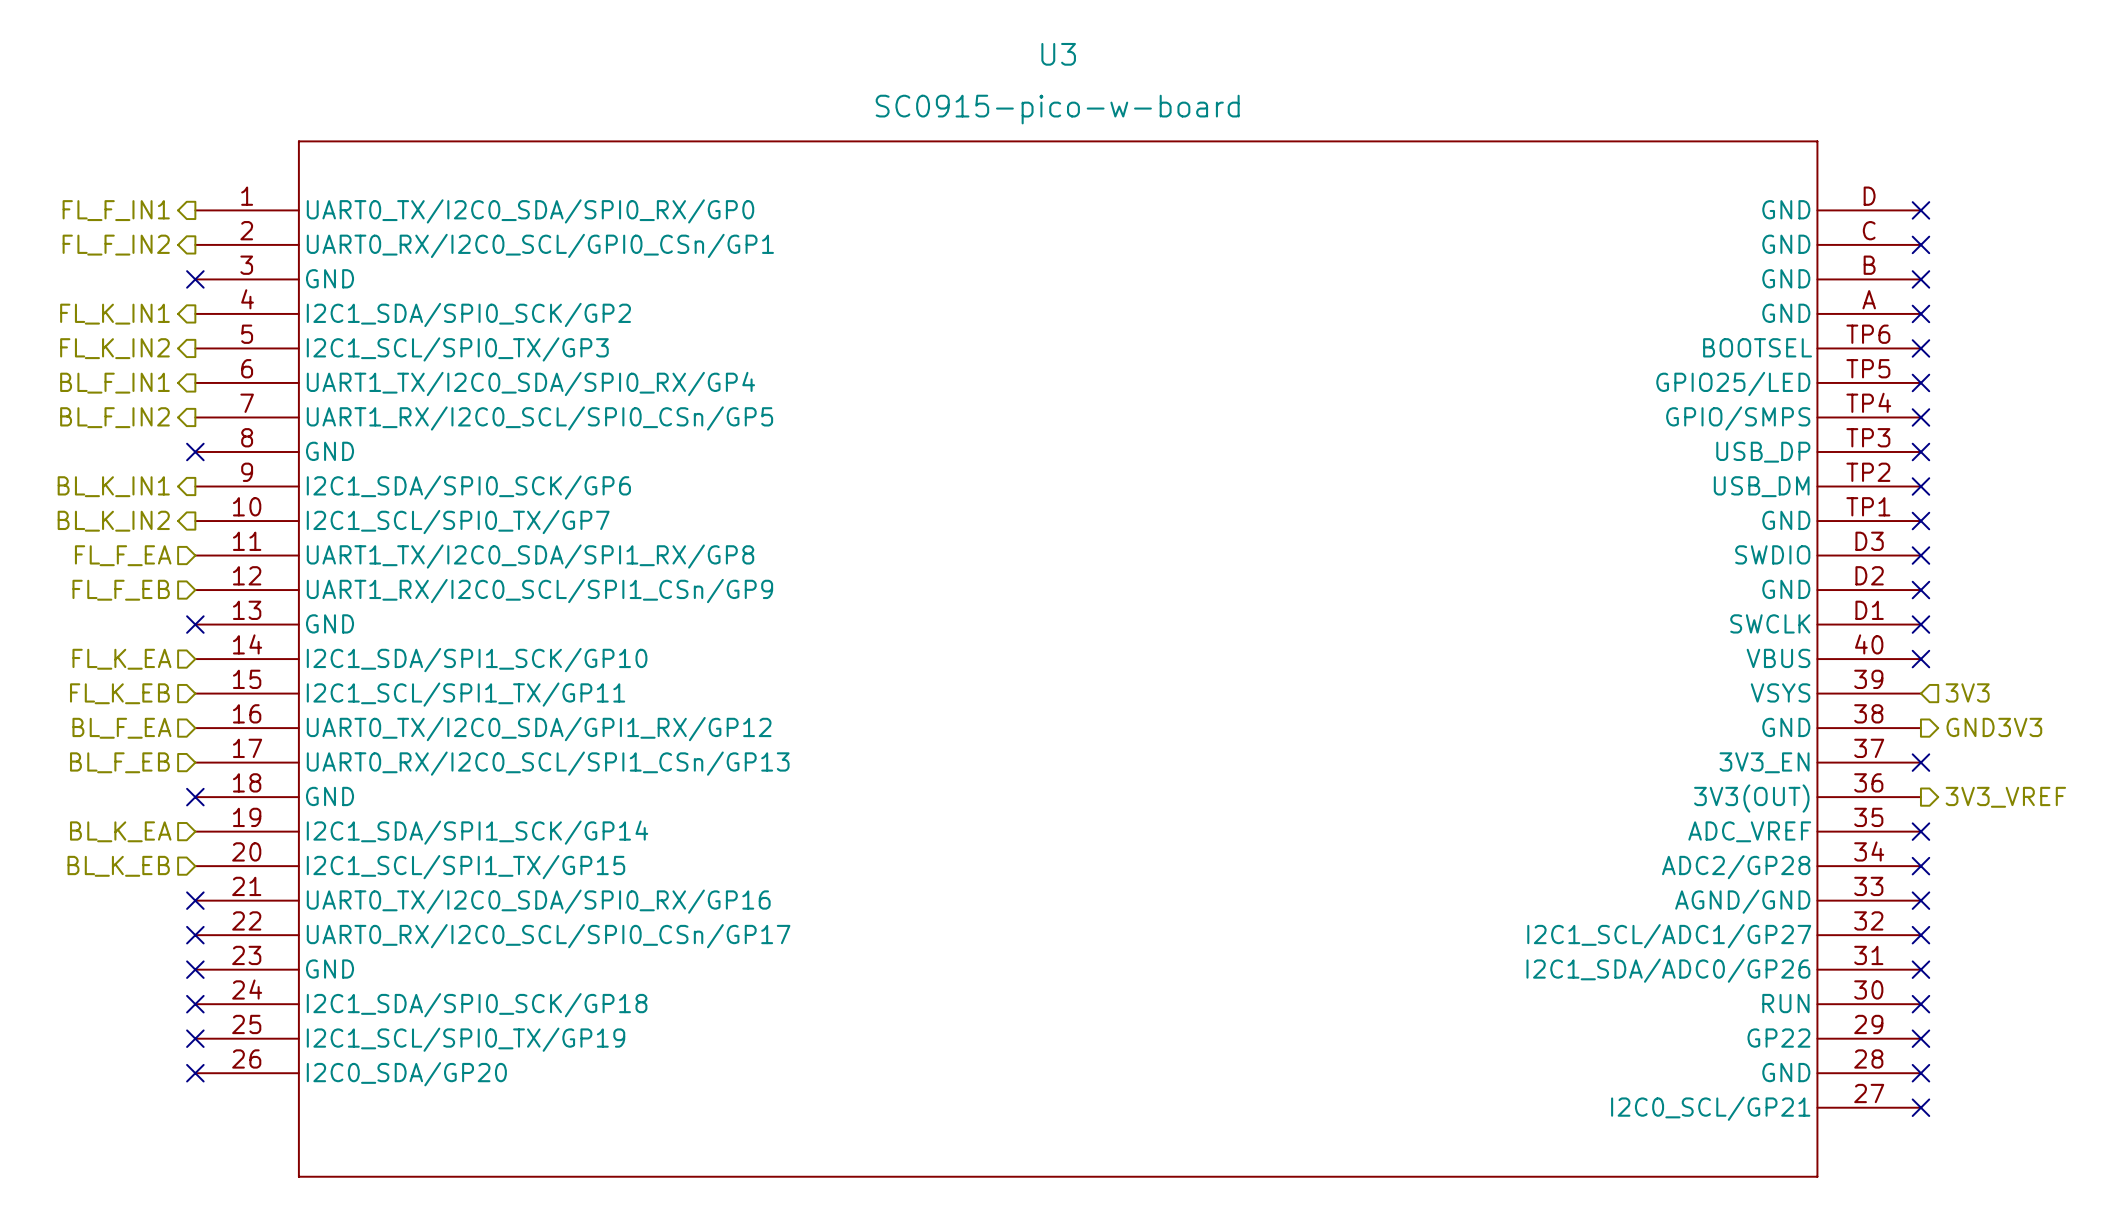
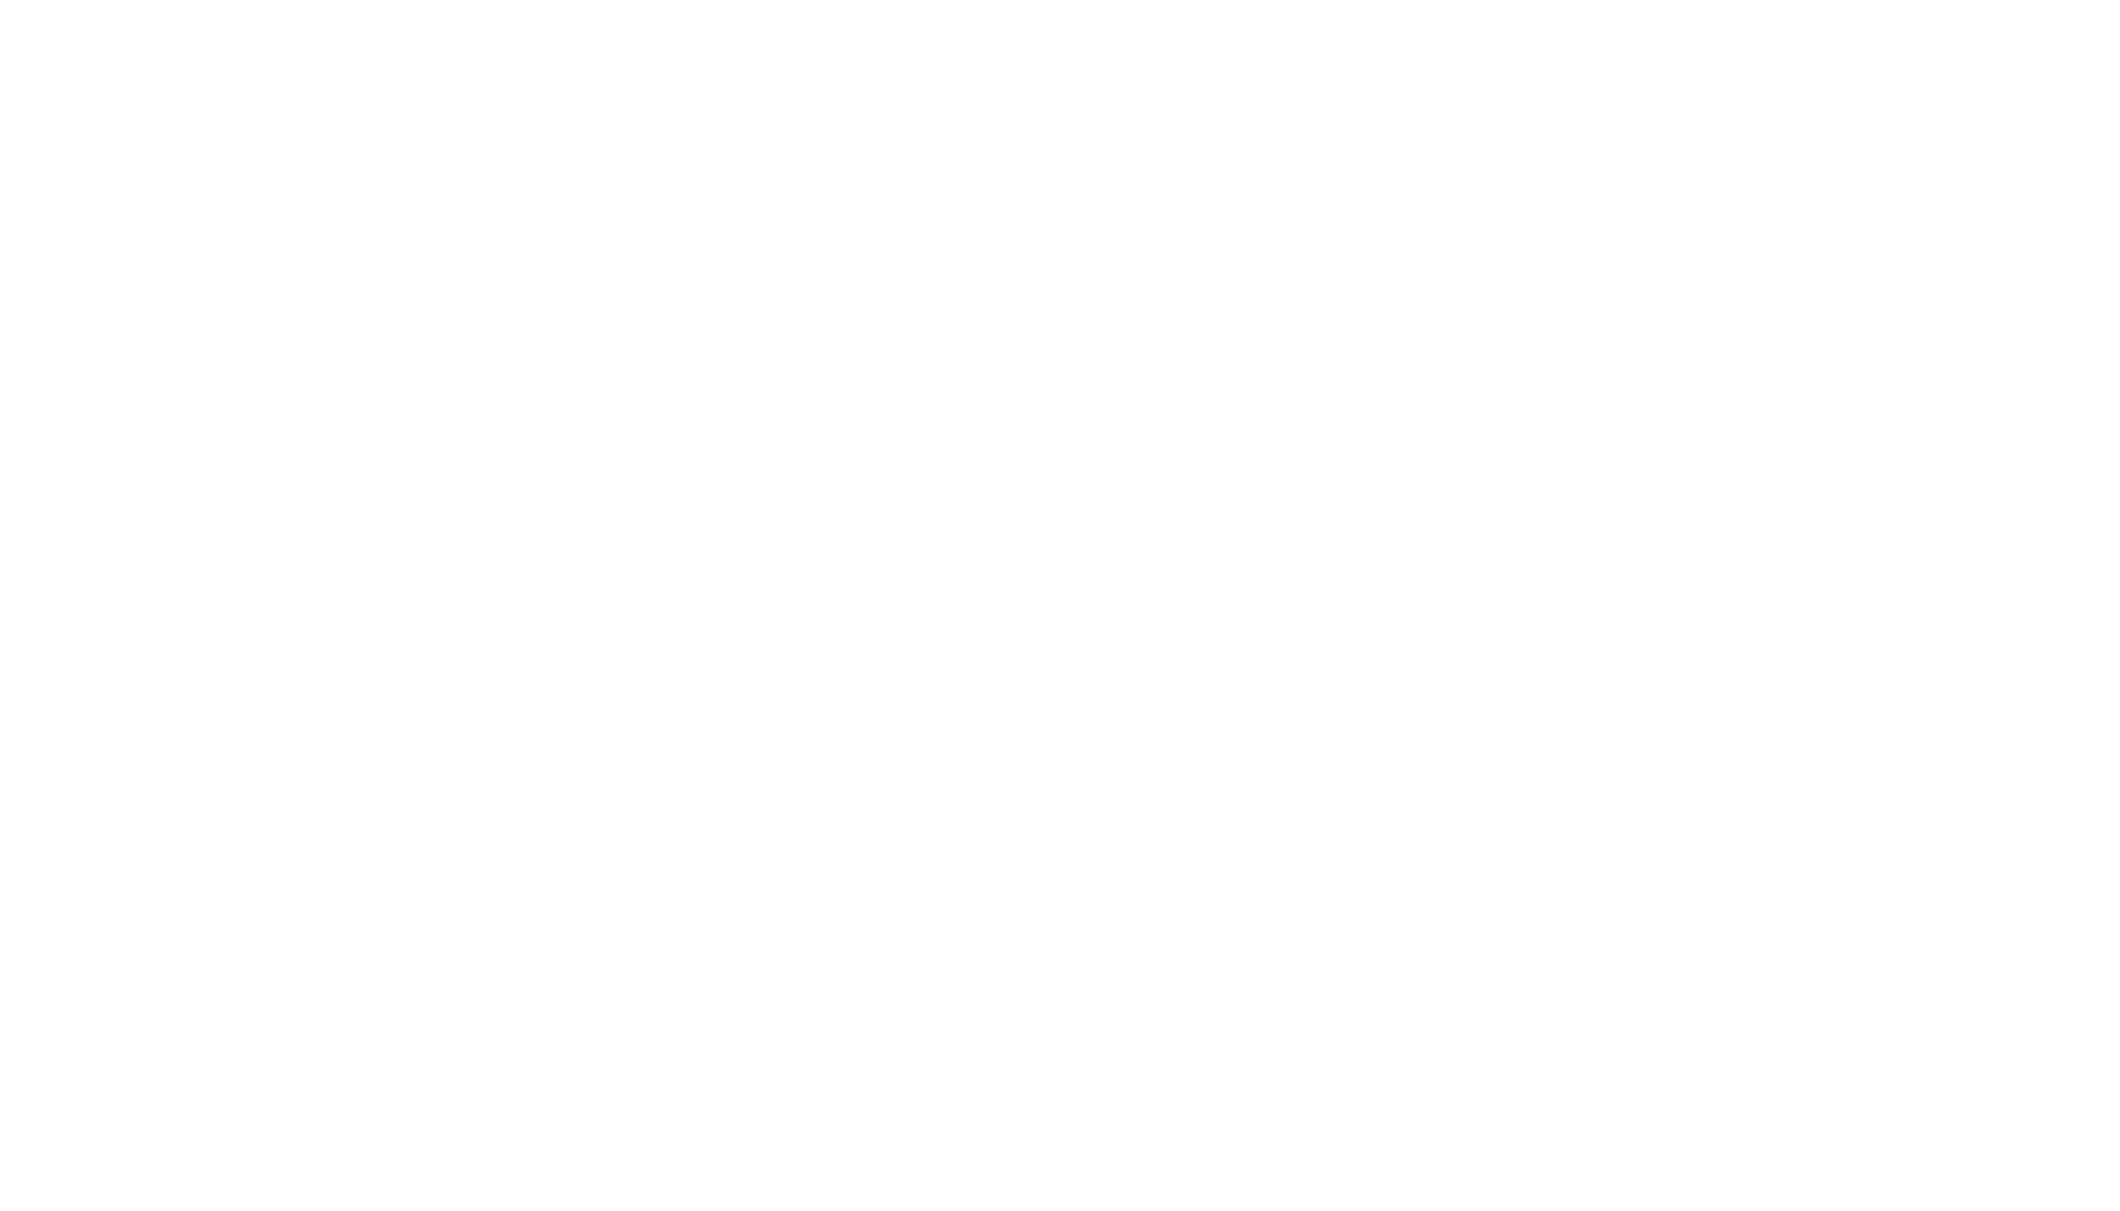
hierarchical label: FL_F_IN1 (116, 210) -> none
no-connect mark: (1920, 210) -> none
no-connect mark: (1920, 244) -> none
hierarchical label: FL_F_IN2 (116, 245) -> none
no-connect mark: (195, 279) -> none
no-connect mark: (1920, 279) -> none
no-connect mark: (1920, 313) -> none
hierarchical label: FL_K_IN1 (114, 314) -> none
hierarchical label: FL_K_IN2 (114, 348) -> none
no-connect mark: (1920, 348) -> none
no-connect mark: (1920, 382) -> none
hierarchical label: BL_F_IN1 (114, 383) -> none
hierarchical label: BL_F_IN2 (114, 417) -> none
no-connect mark: (1920, 417) -> none
no-connect mark: (195, 451) -> none
no-connect mark: (1920, 451) -> none
hierarchical label: BL_K_IN1 (113, 486) -> none
no-connect mark: (1920, 486) -> none
hierarchical label: BL_K_IN2 (113, 521) -> none
no-connect mark: (1920, 521) -> none
hierarchical label: FL_F_EA (123, 555) -> none
no-connect mark: (1920, 555) -> none
hierarchical label: FL_F_EB (121, 590) -> none
no-connect mark: (1920, 590) -> none
no-connect mark: (195, 624) -> none
no-connect mark: (1920, 624) -> none
hierarchical label: FL_K_EA (121, 659) -> none
U3: SC0915-pico-w-board (1058, 659) -> none
no-connect mark: (1920, 659) -> none
hierarchical label: 3V3 (1967, 692) -> none
hierarchical label: FL_K_EB (119, 693) -> none
hierarchical label: GND3V3 (1994, 727) -> none
hierarchical label: BL_F_EA (121, 728) -> none
hierarchical label: BL_F_EB (119, 762) -> none
no-connect mark: (1920, 762) -> none
no-connect mark: (195, 797) -> none
hierarchical label: 3V3_VREF (2005, 797) -> none
hierarchical label: BL_K_EA (120, 831) -> none
no-connect mark: (1920, 831) -> none
hierarchical label: BL_K_EB (118, 866) -> none
no-connect mark: (1920, 866) -> none
no-connect mark: (195, 900) -> none
no-connect mark: (1920, 900) -> none
no-connect mark: (195, 935) -> none
no-connect mark: (1920, 935) -> none
no-connect mark: (195, 969) -> none
no-connect mark: (1920, 969) -> none
no-connect mark: (195, 1004) -> none
no-connect mark: (1920, 1004) -> none
no-connect mark: (195, 1038) -> none
no-connect mark: (1920, 1038) -> none
no-connect mark: (195, 1073) -> none
no-connect mark: (1920, 1073) -> none
no-connect mark: (1920, 1107) -> none

